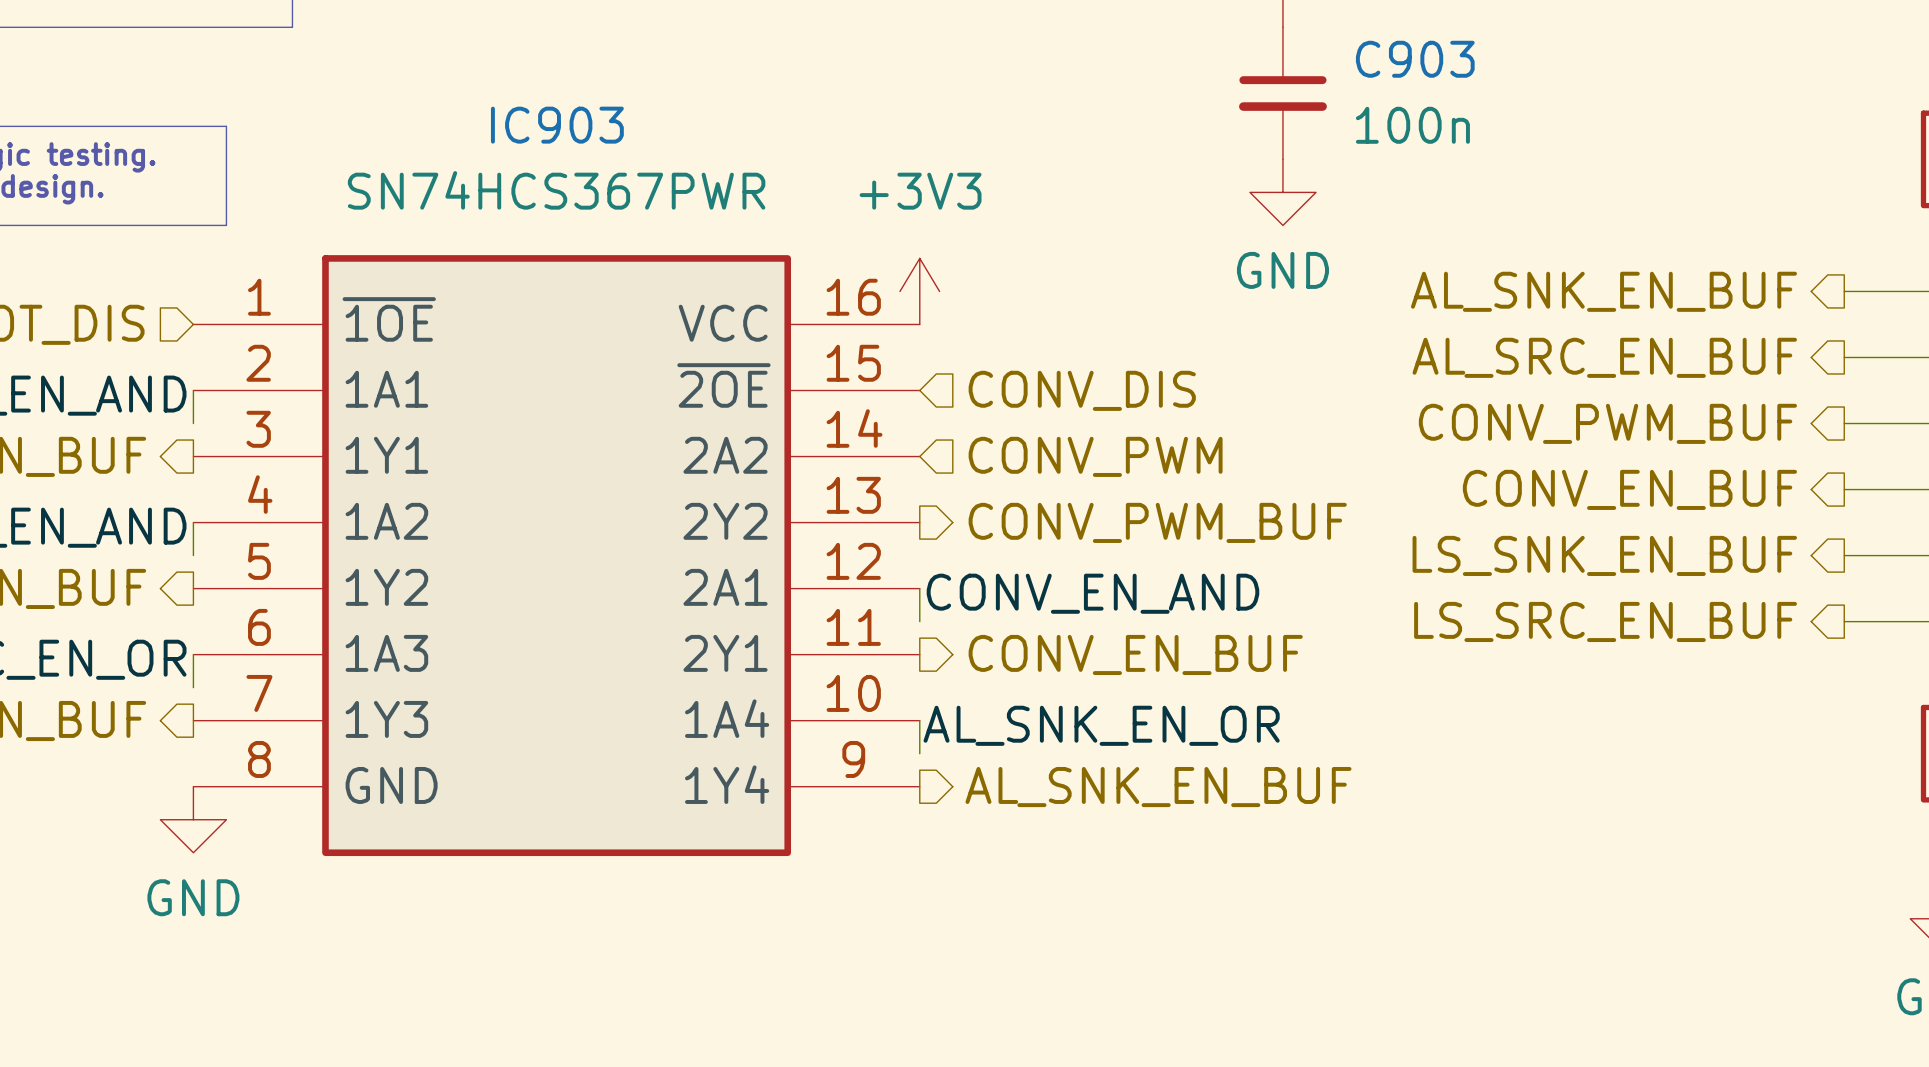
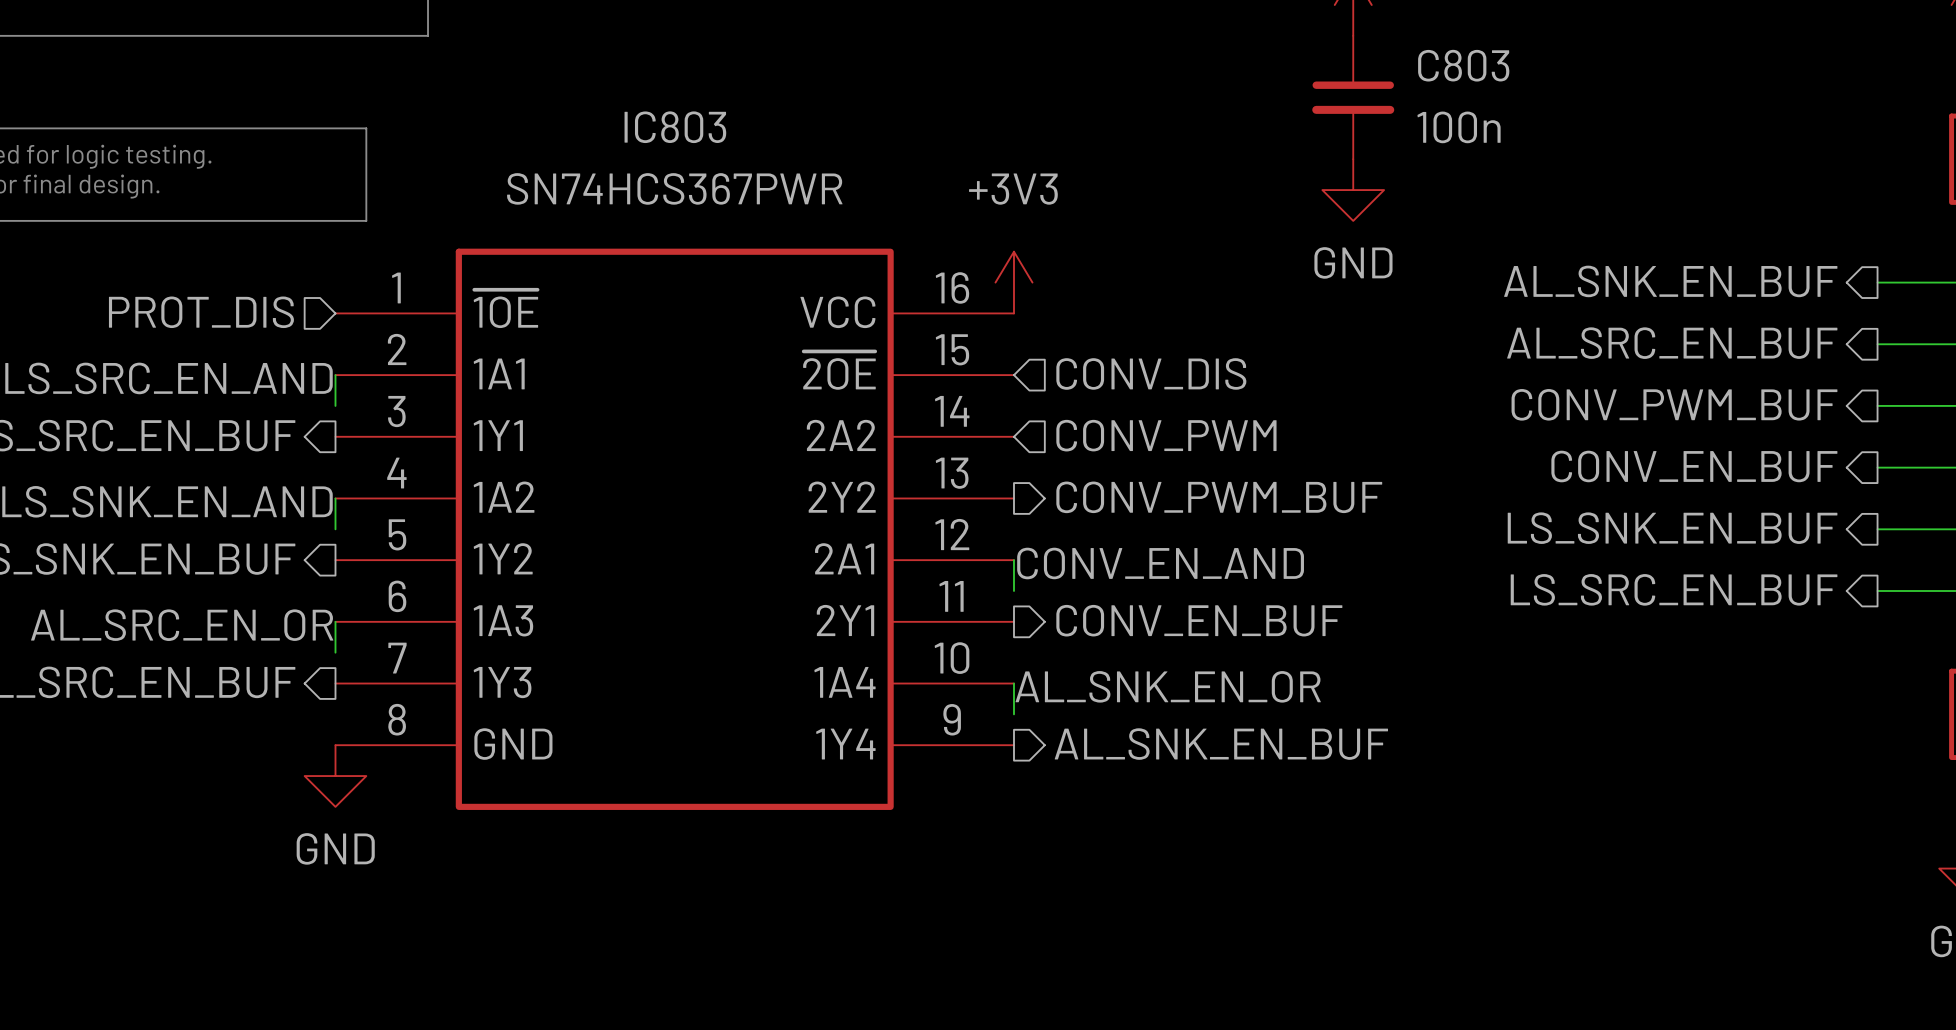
C903 name: C903 (1415, 59) -> C803 (1463, 65)
IC903 name: IC903 (557, 125) -> IC803 (675, 127)

